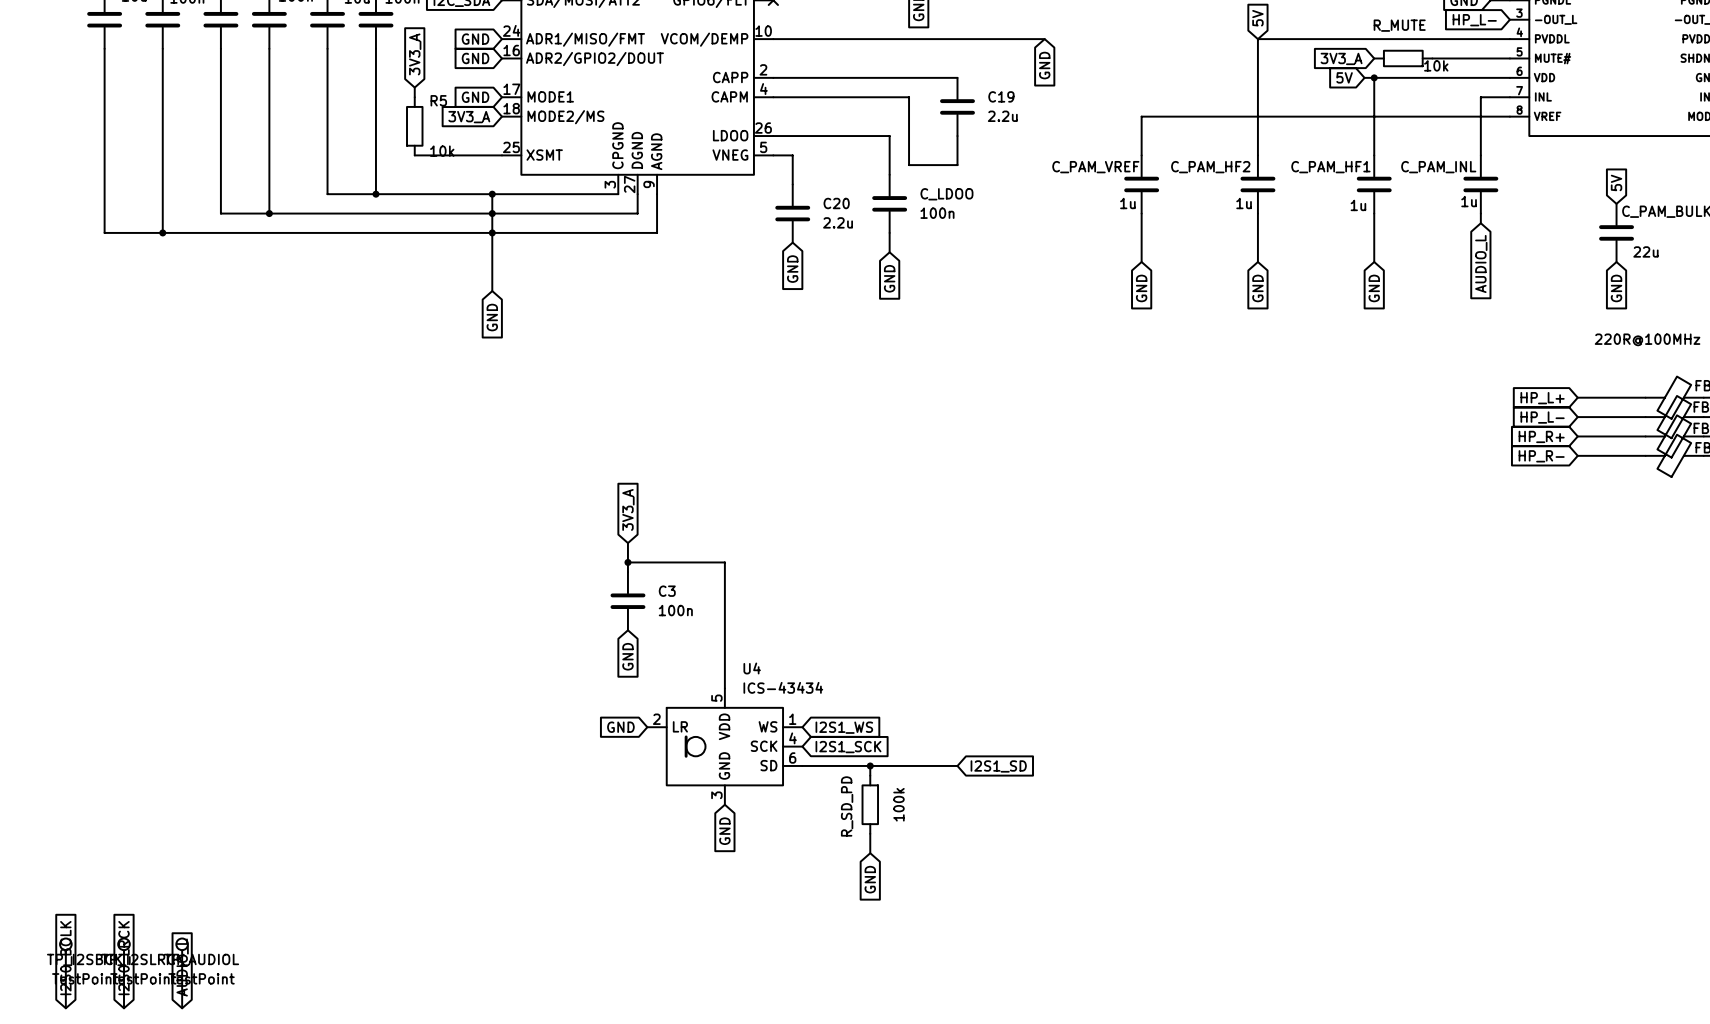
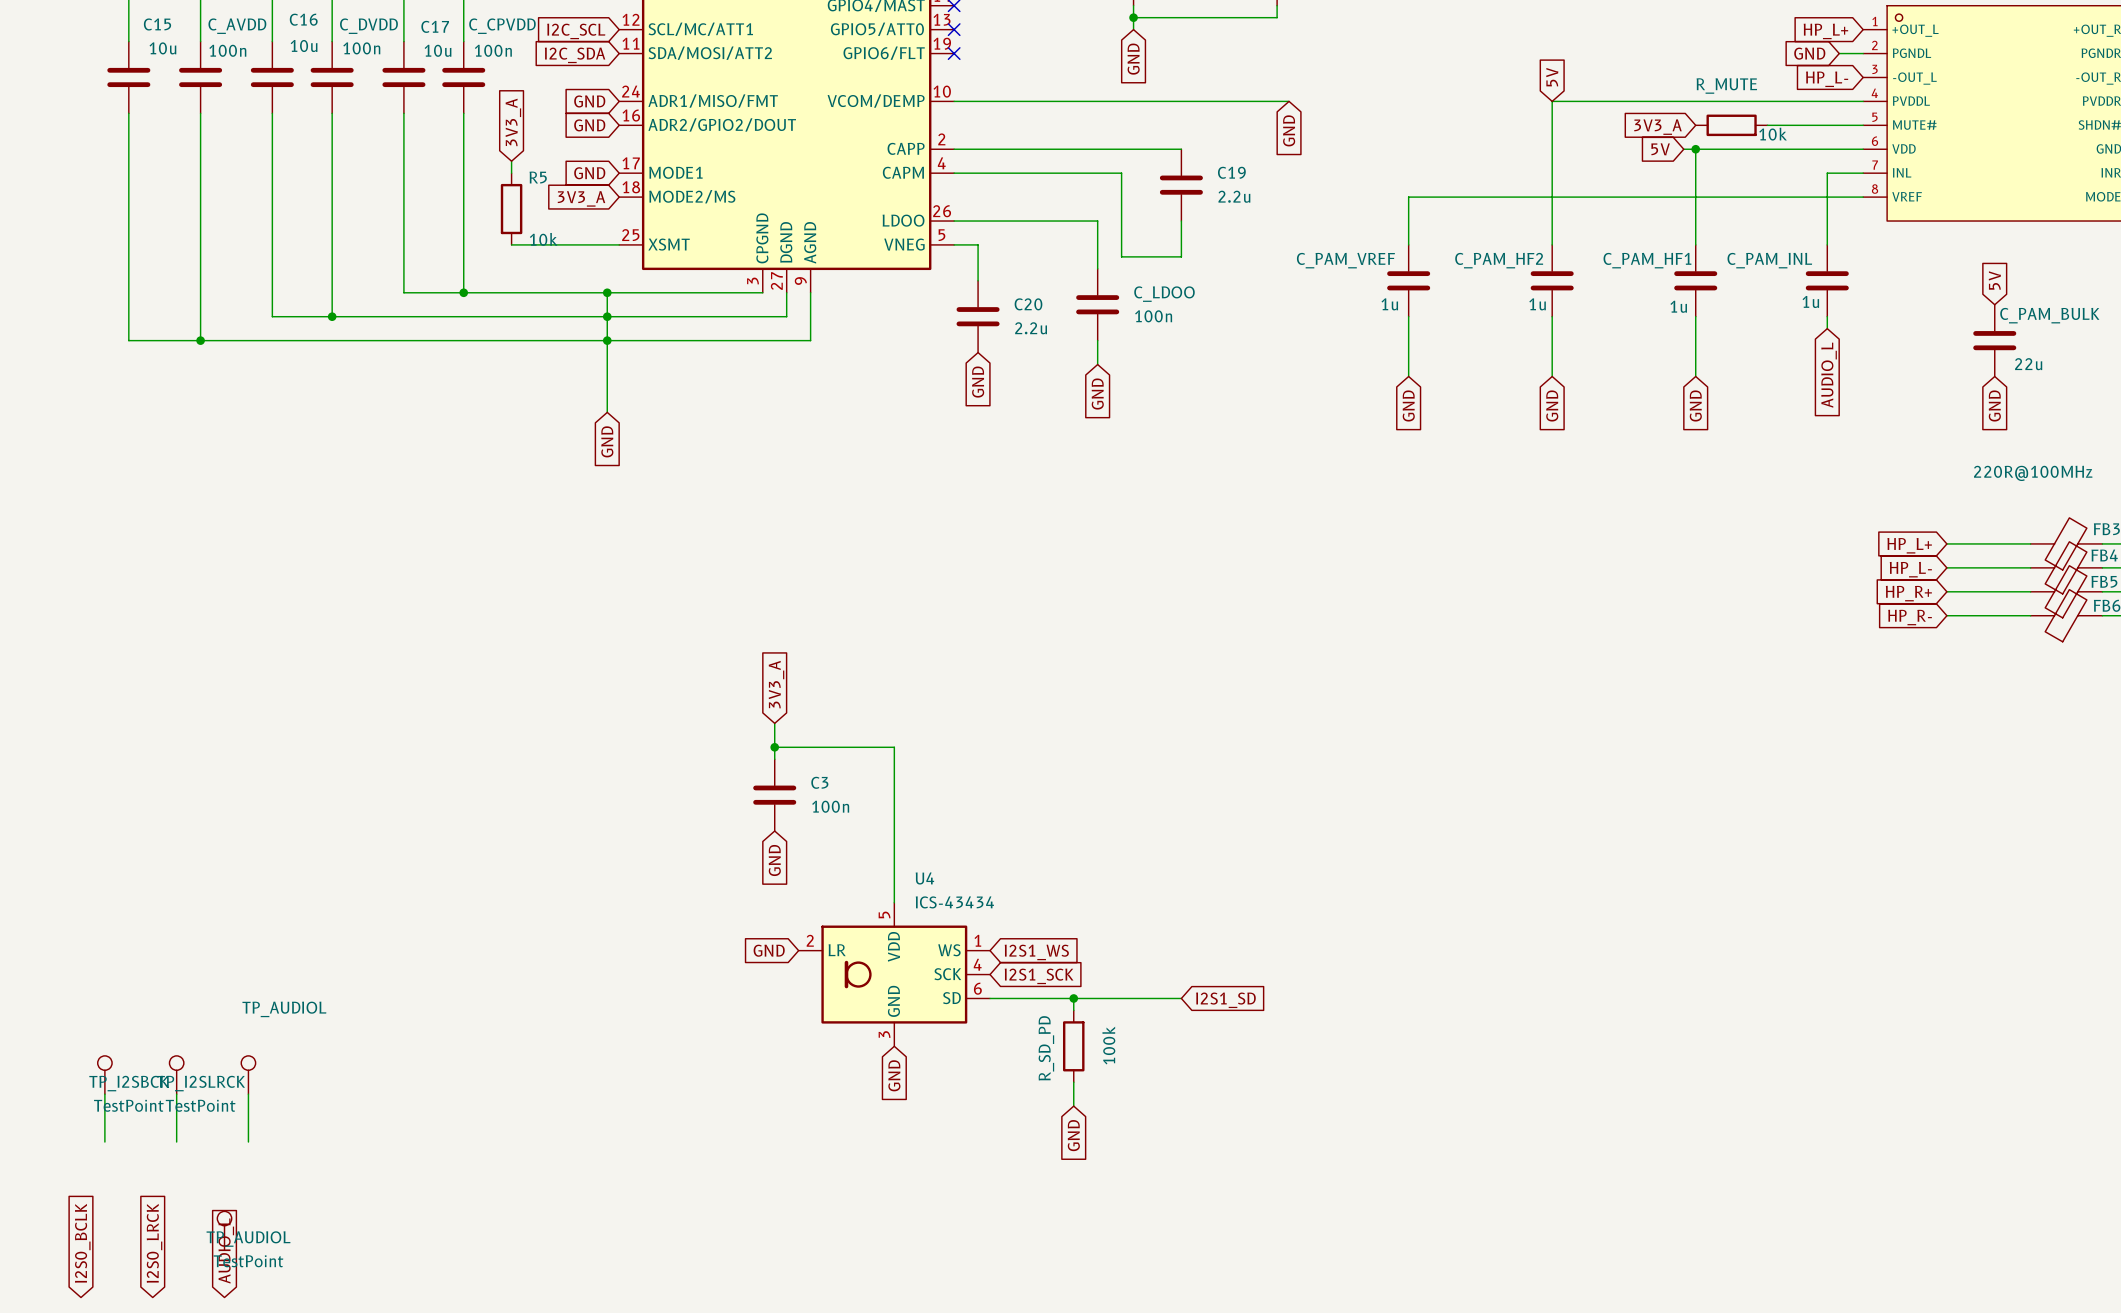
TP_AUDIOL: none -> (248, 1075)
TP_I2SBCK position: (65, 954) -> (104, 1075)
TP_I2SLRCK position: (124, 954) -> (176, 1075)
wire: (65, 969) (65, 1008) -> (104, 1094) (104, 1142)
wire: (124, 969) (124, 1008) -> (176, 1094) (176, 1142)
wire: (182, 969) (182, 1008) -> (248, 1094) (248, 1142)

